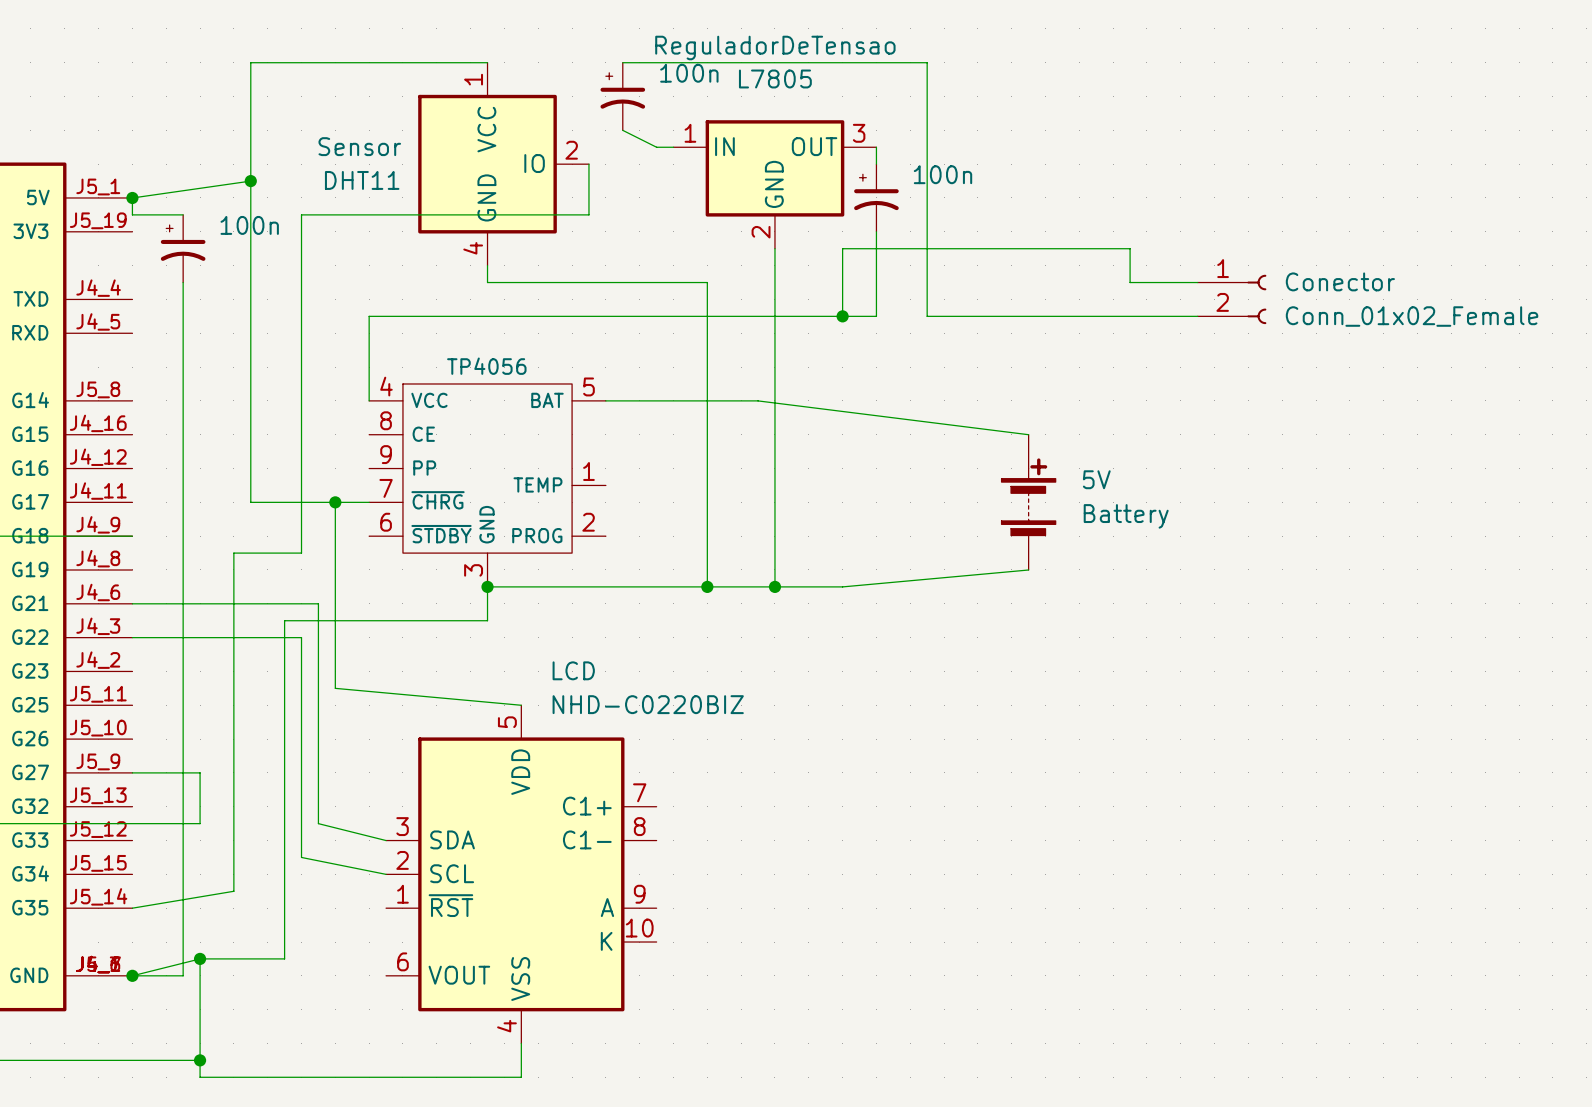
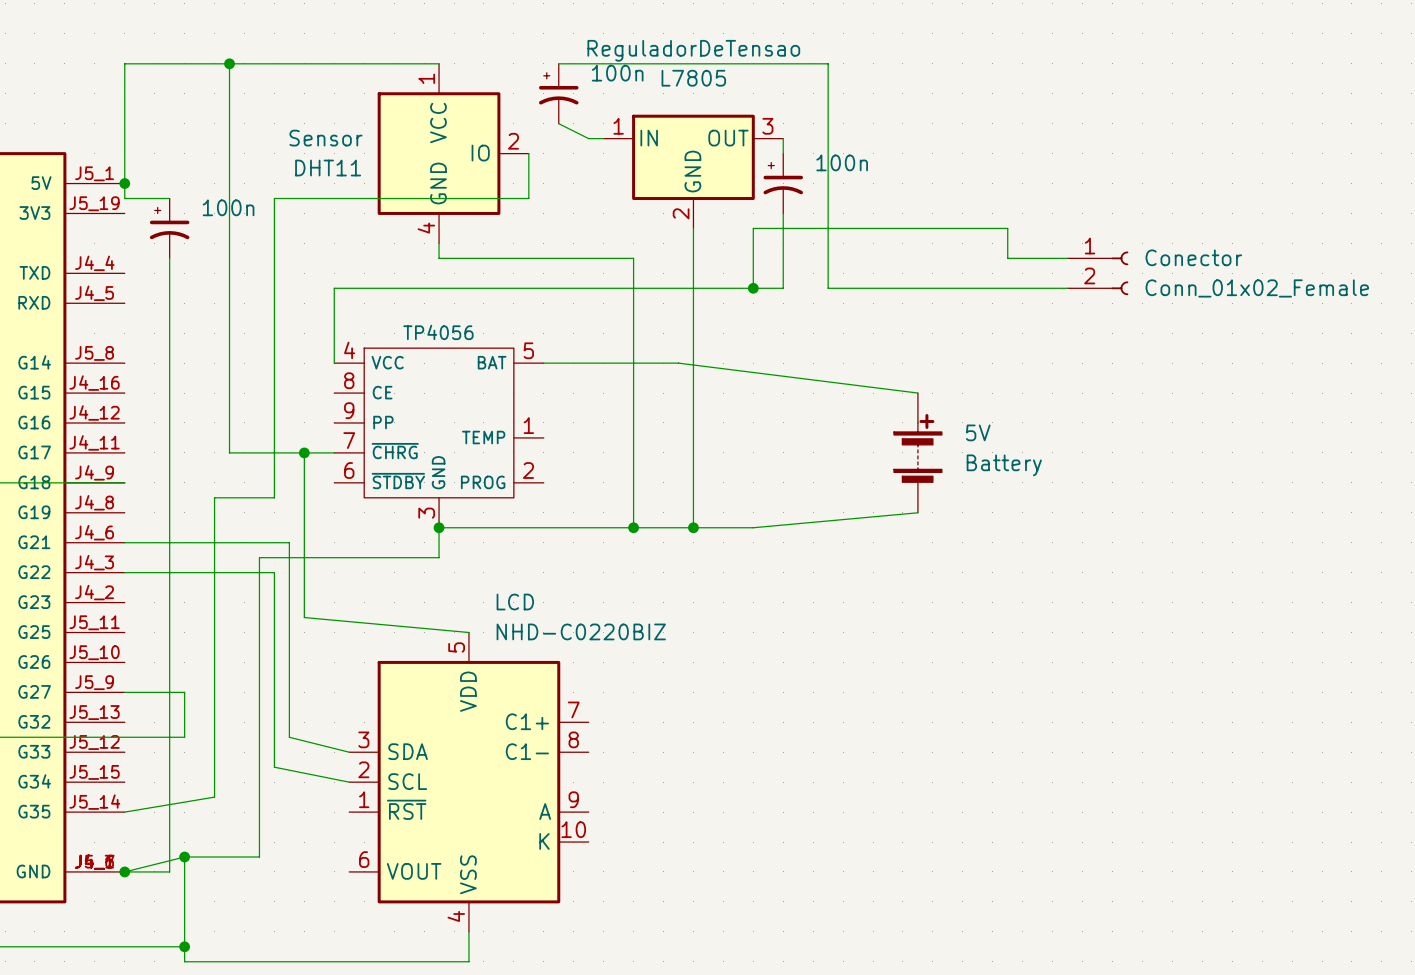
junction: none -> (229, 63)
wire: (250, 181) (132, 197) -> (229, 63) (124, 63) (124, 183)
junction: (250, 181) -> none

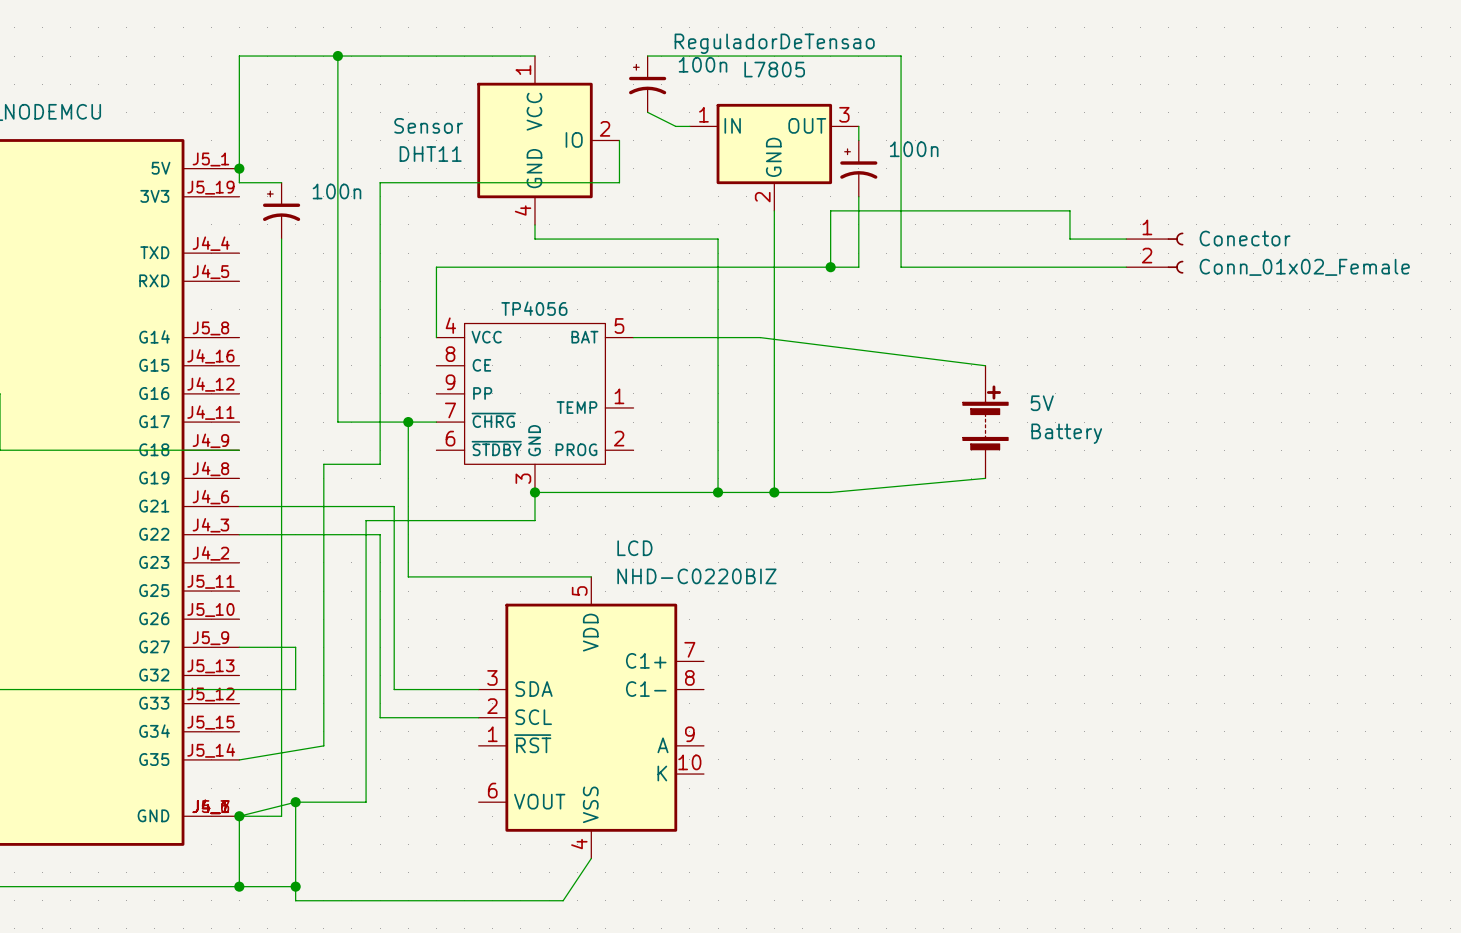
wire: (304, 617) (468, 632) -> (408, 576) (591, 576)
wire: (289, 737) (349, 752) -> (394, 689) (478, 689)
wire: (274, 767) (349, 782) -> (380, 717) (478, 717)
LCD position: (468, 782) -> (591, 717)
wire: none -> (239, 816) (239, 886)
wire: (468, 931) (468, 961) -> (591, 858) (563, 900)
junction: none -> (239, 886)

